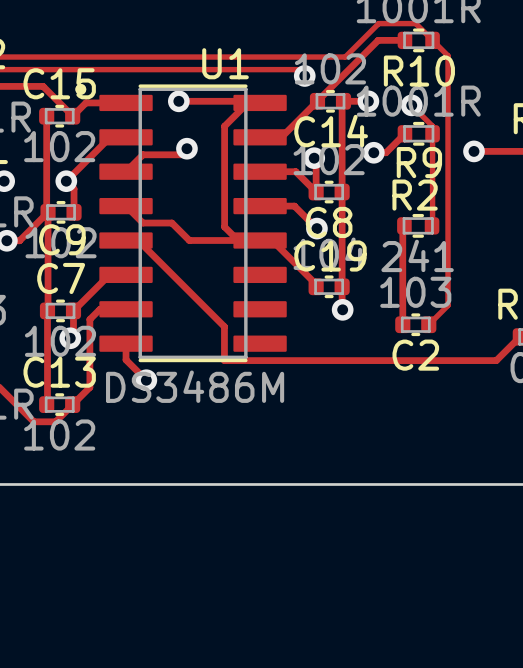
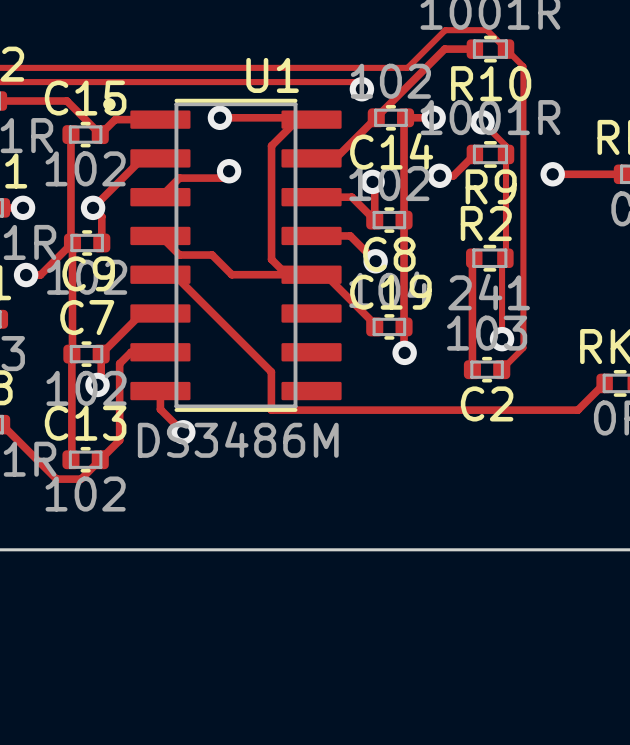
track: none -> (502, 261) (502, 339)
via: none -> (502, 339)

